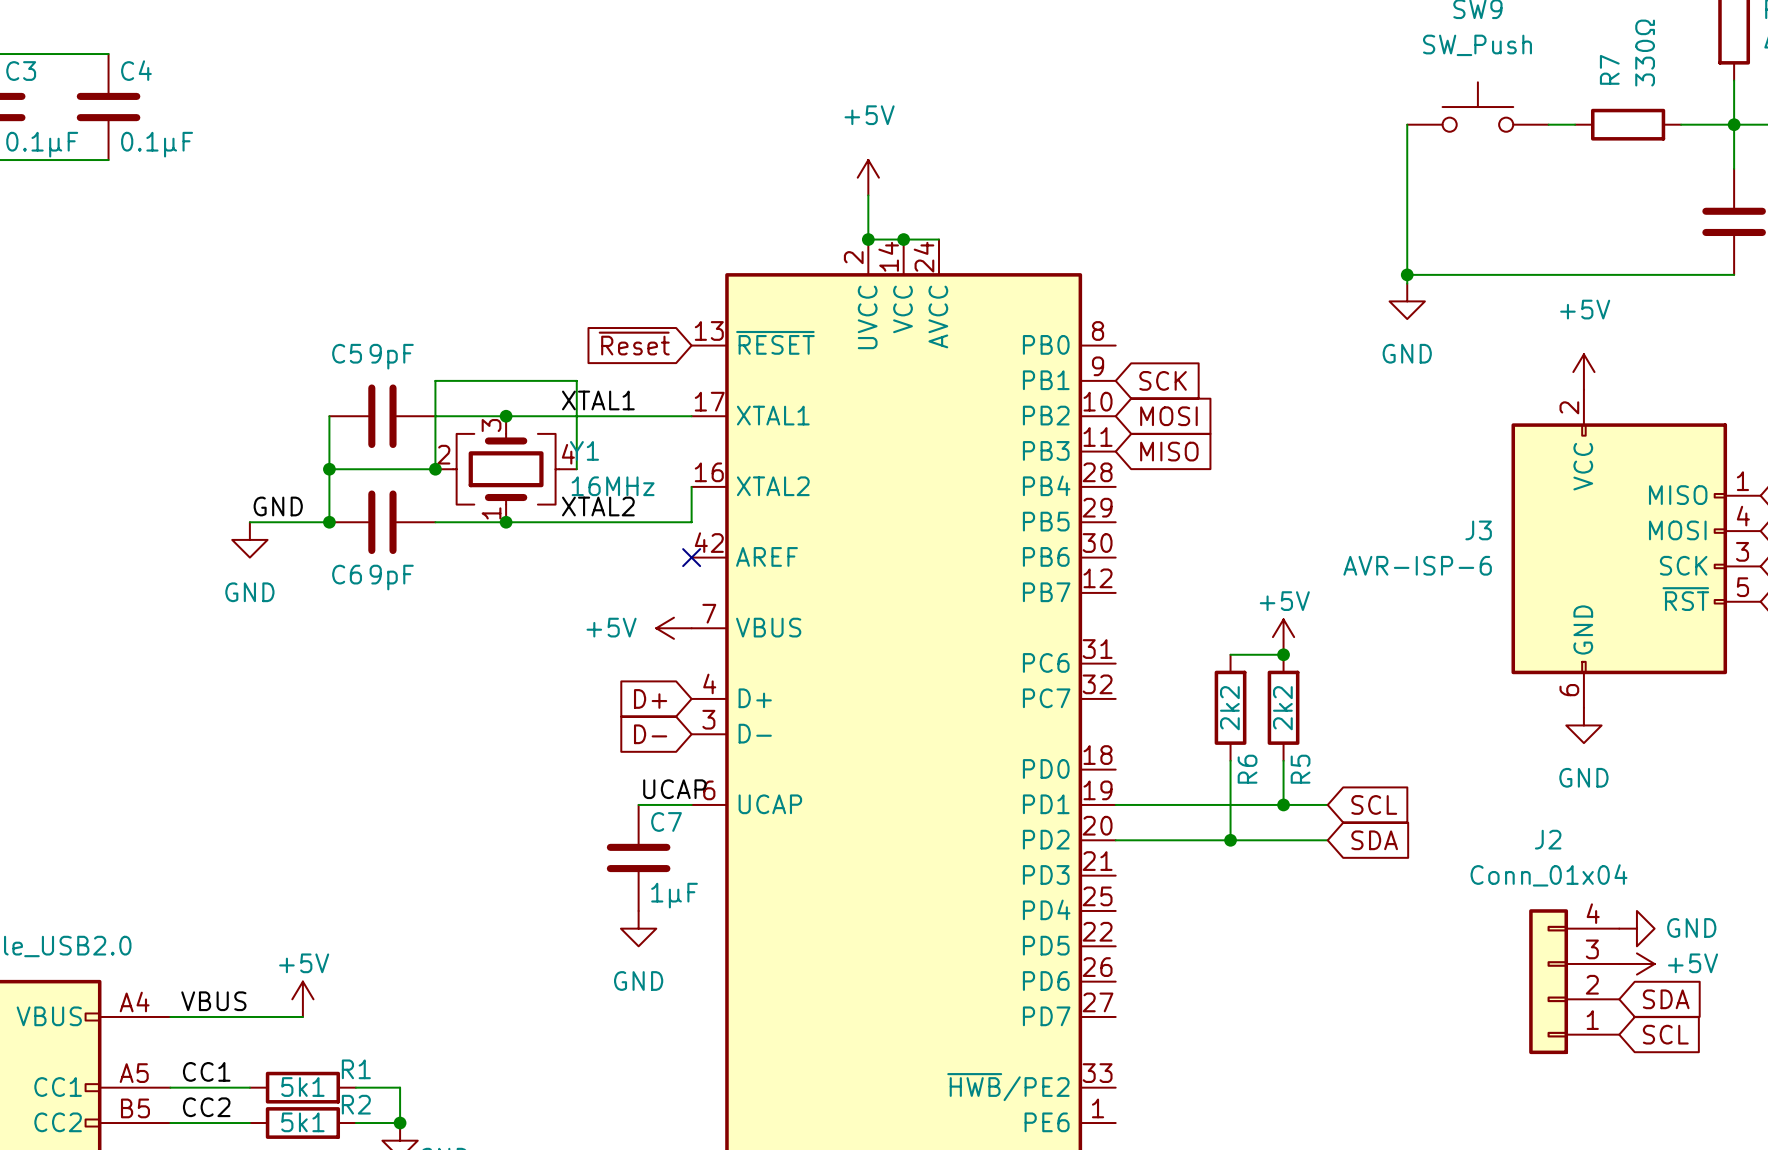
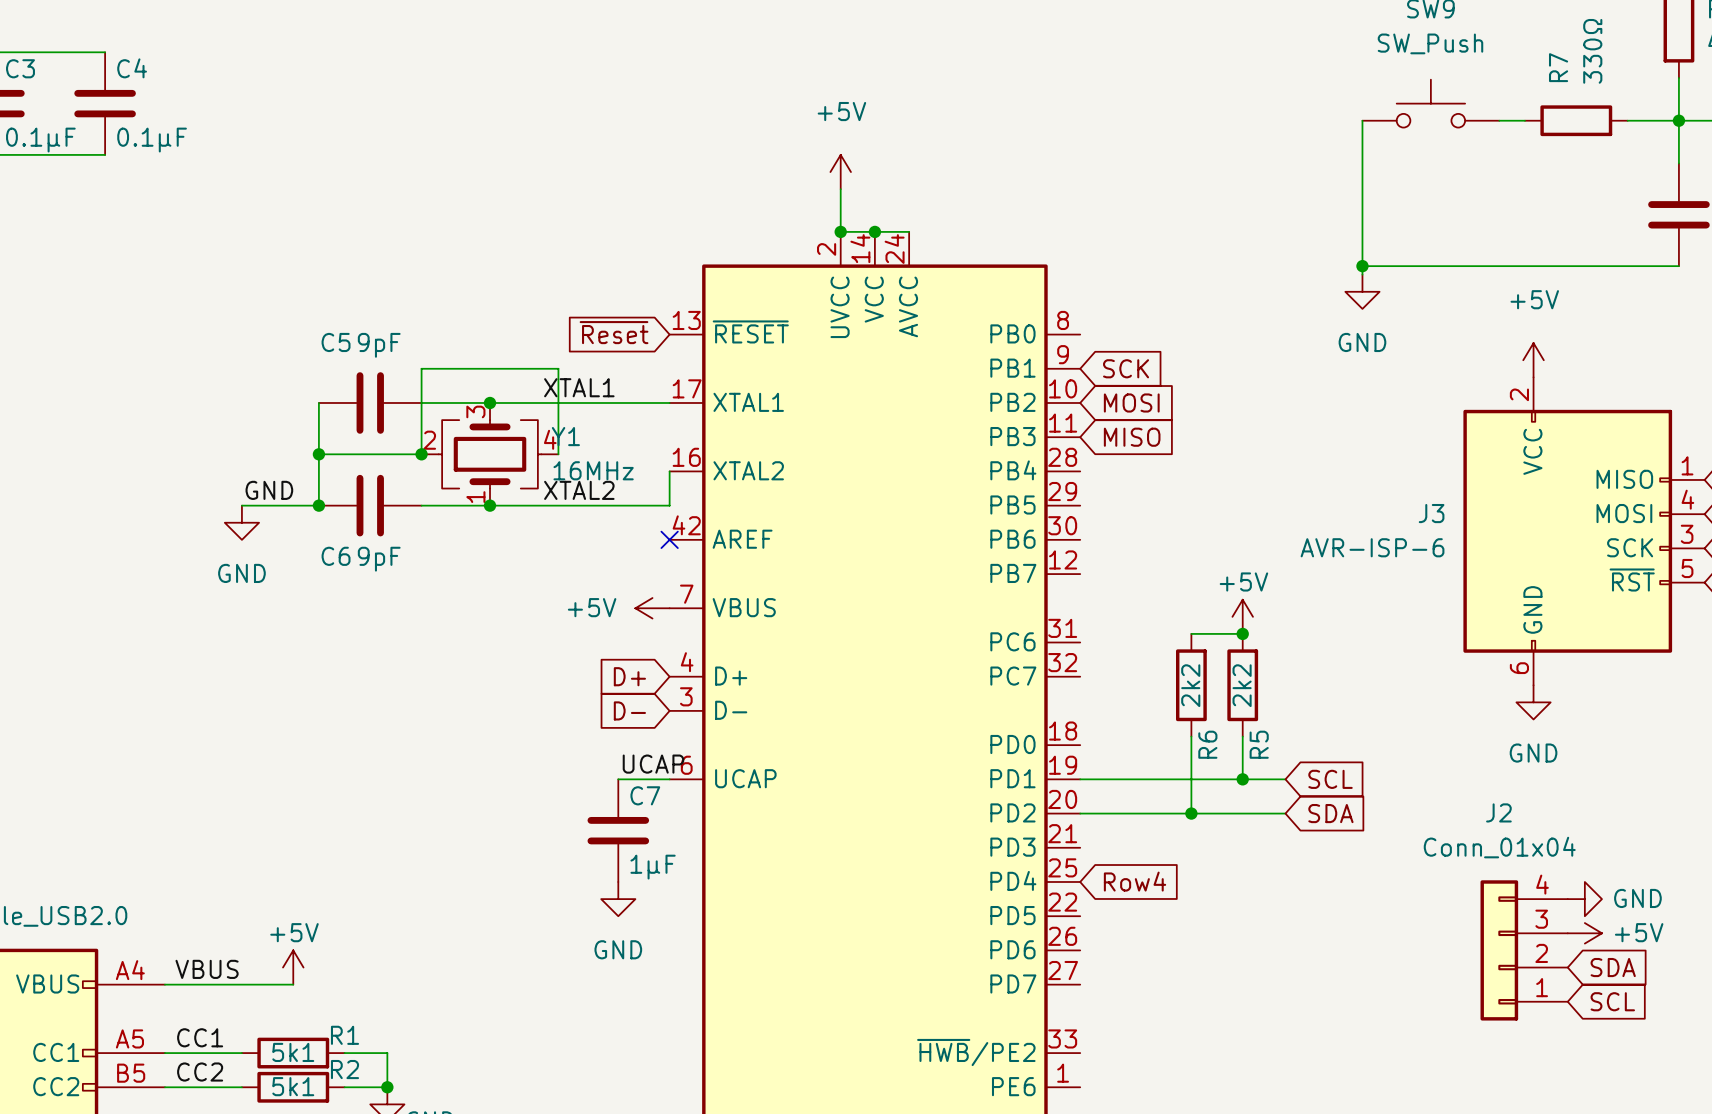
global label: none -> Row4 (1135, 881)

